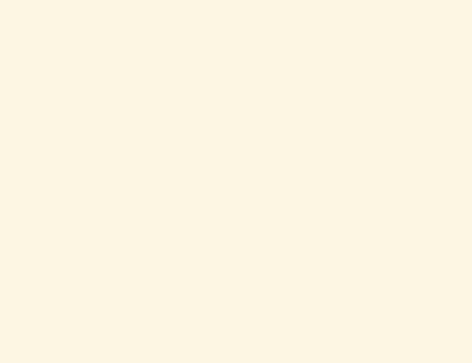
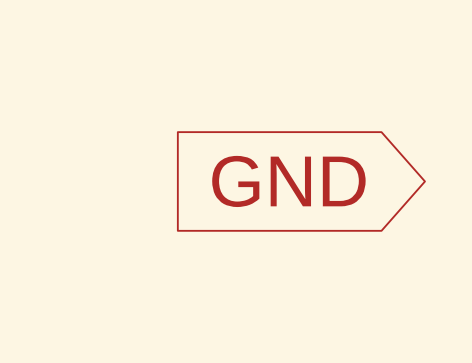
global label: none -> GND (288, 181)

